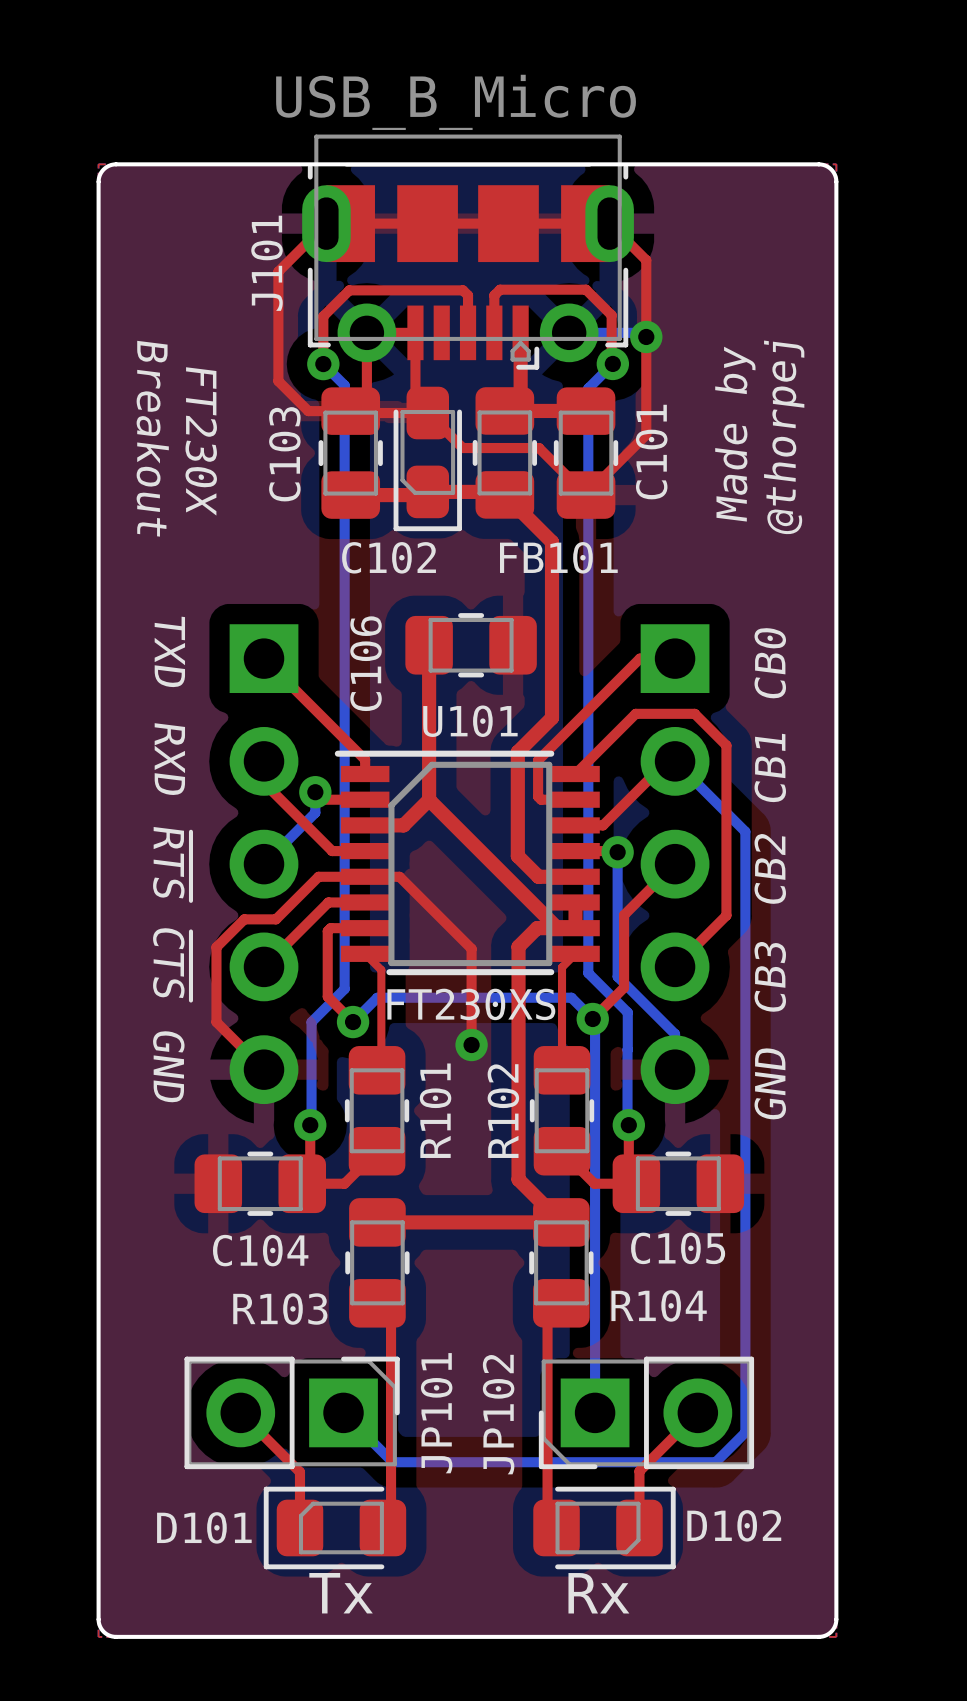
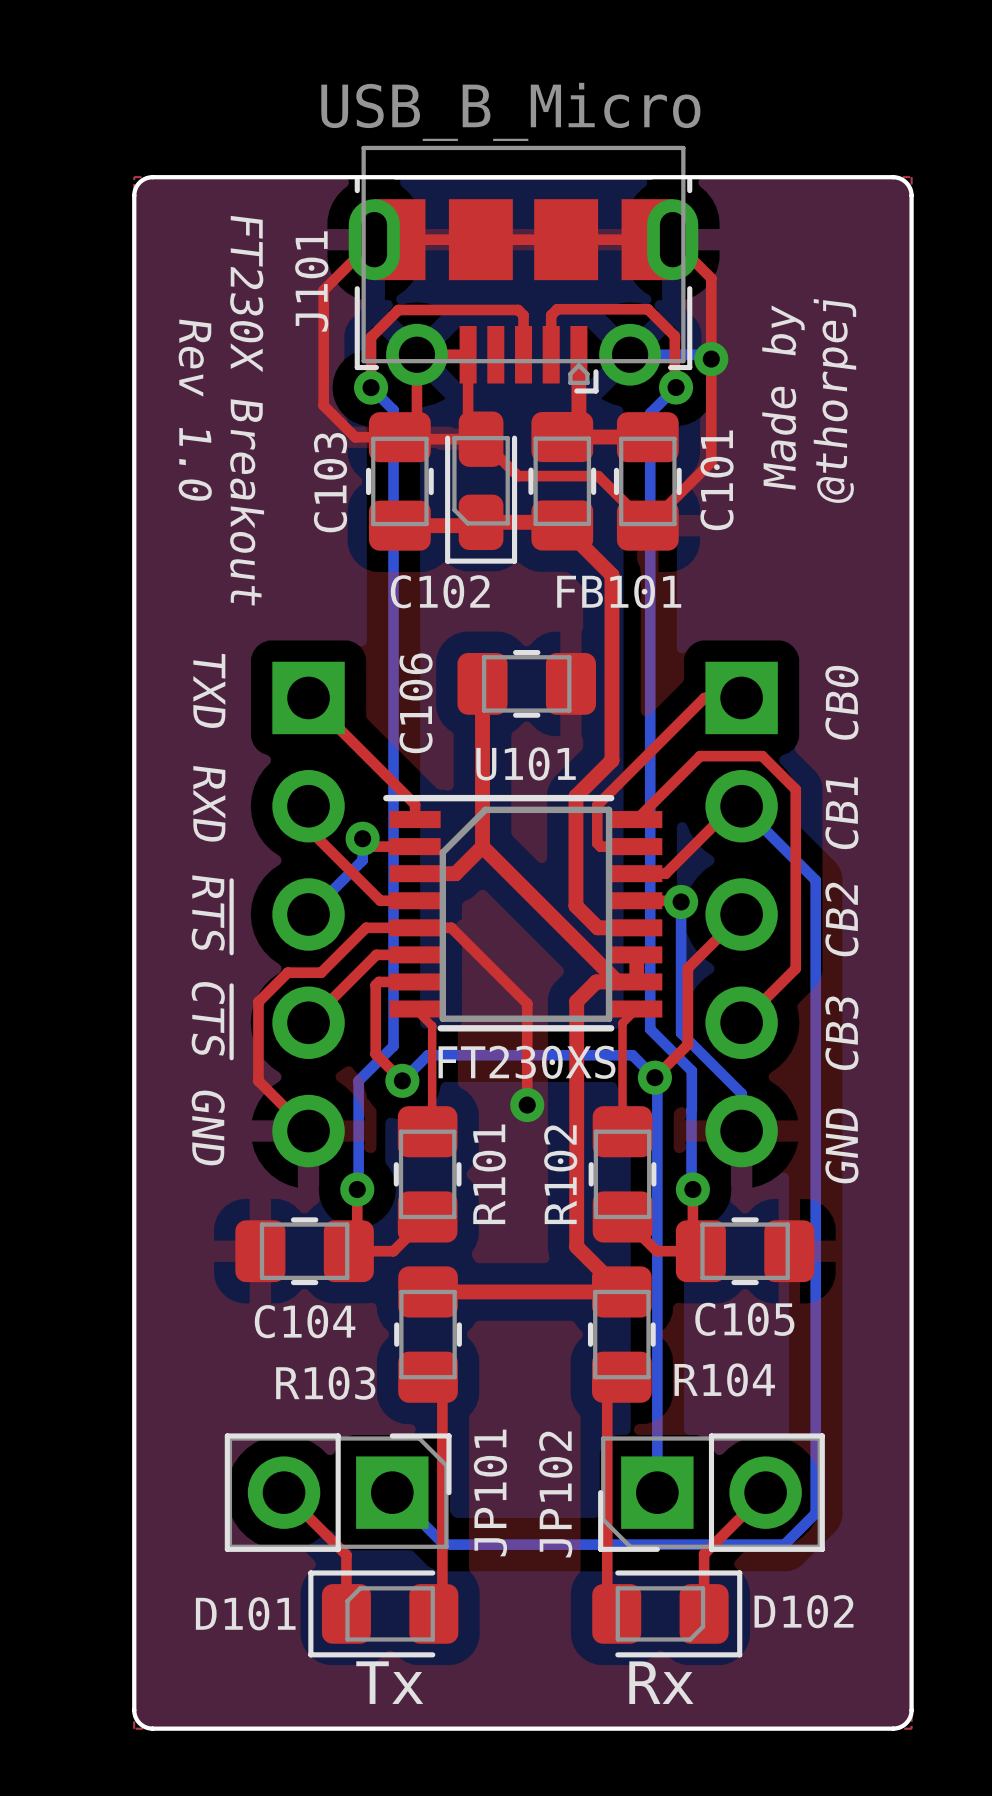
text: none -> Rev 1.0 (195, 410)
text position: Made by (735, 434) -> Made by (783, 397)
text position: @thorpej (784, 437) -> @thorpej (834, 401)
text: Breakout (152, 438) -> FT230X Breakout (247, 410)
text: FT230X (201, 441) -> none

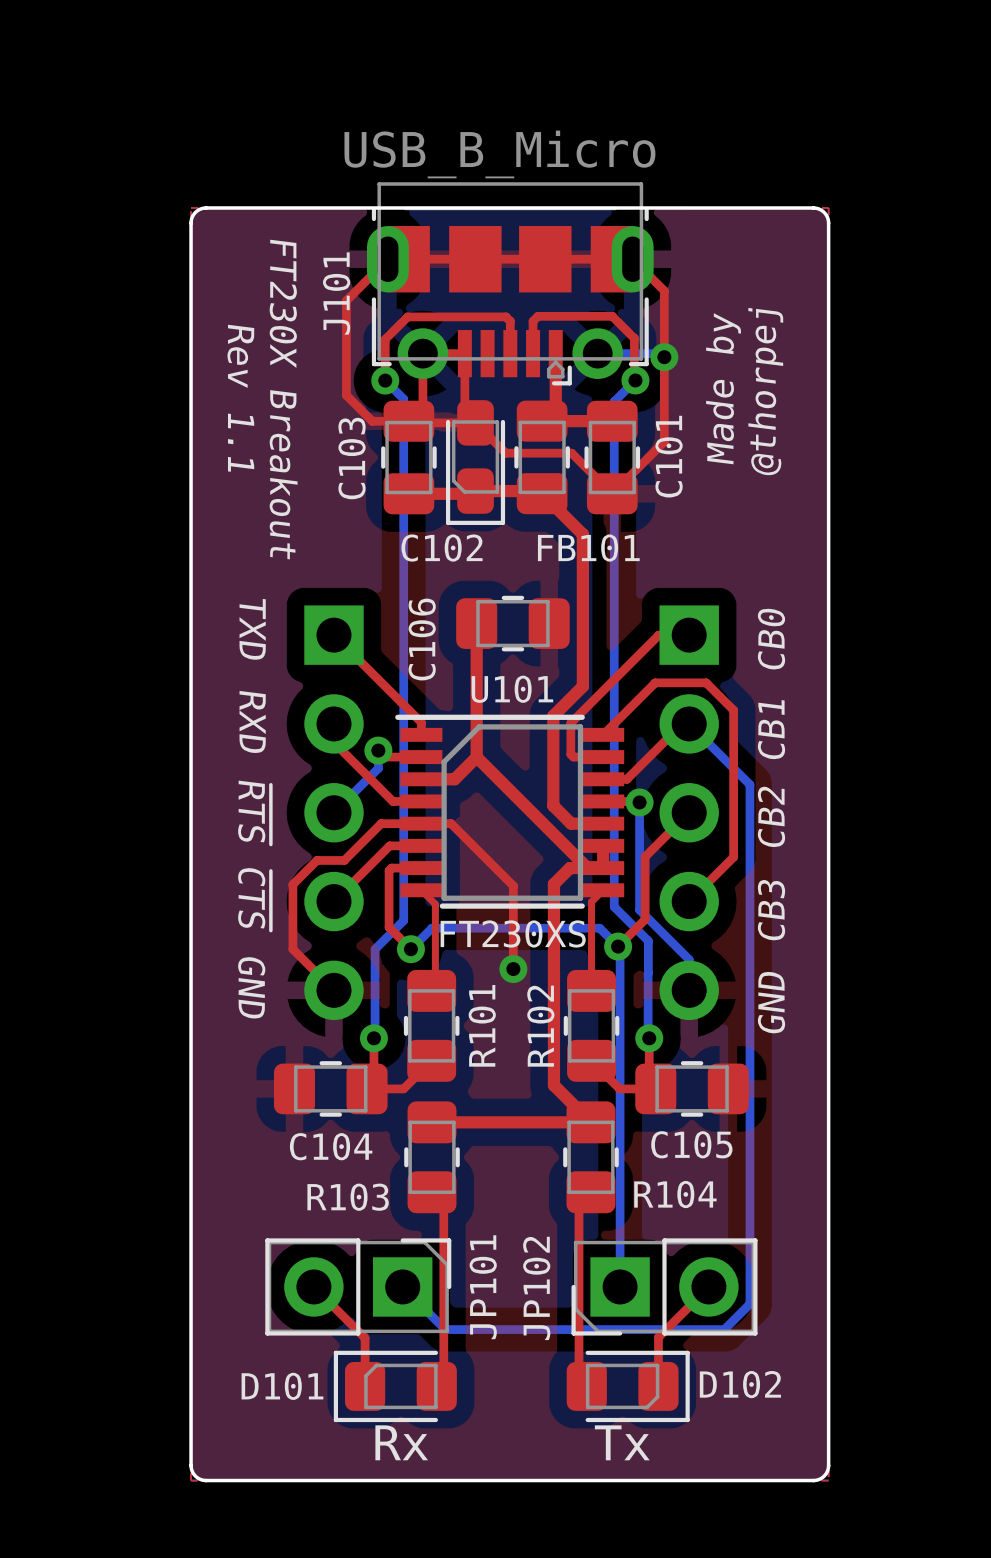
text: Rev 1.0 (195, 410) -> Rev 1.1 (240, 398)
D101 value: Tx (389, 1682) -> Rx (401, 1442)
D102 value: Rx (661, 1682) -> Tx (622, 1442)

